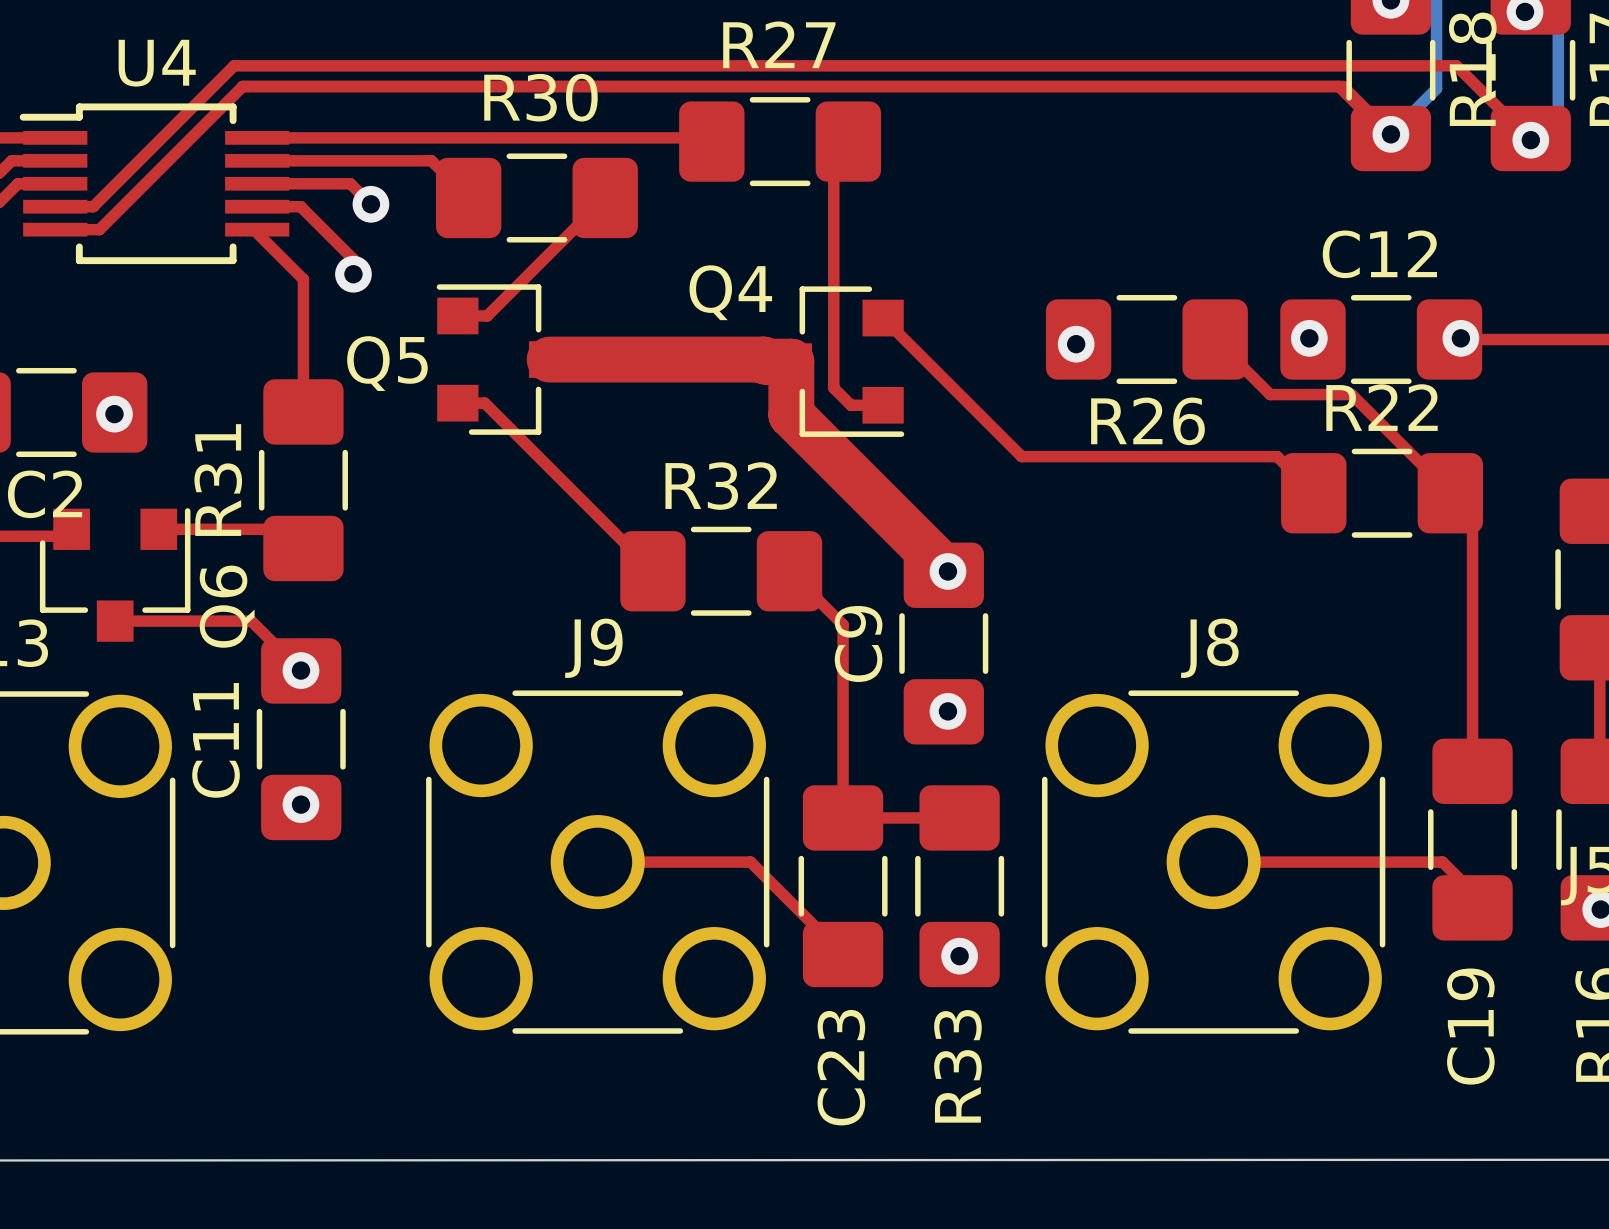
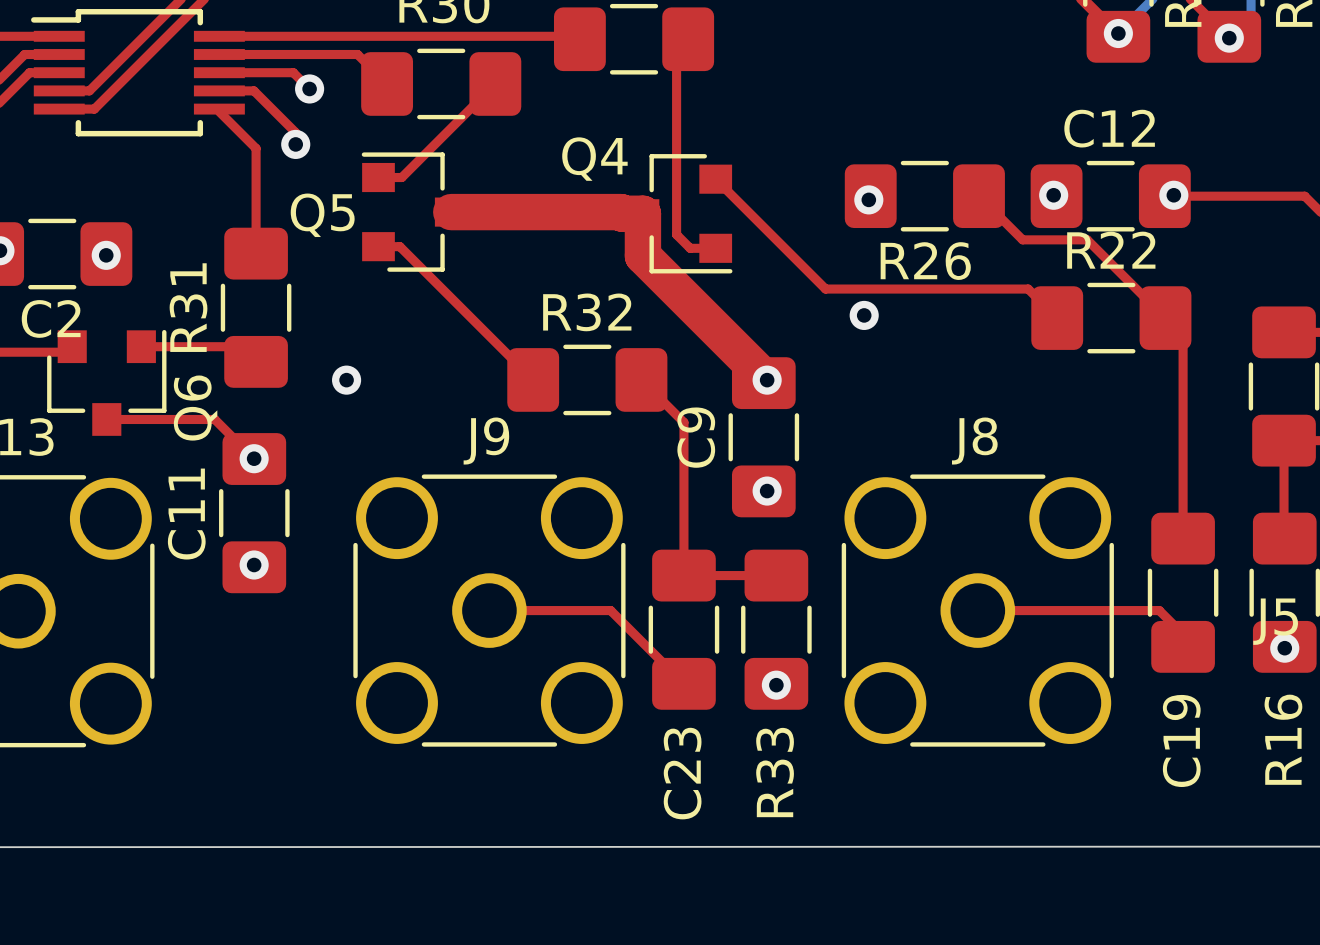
via: none -> (864, 315)
via: none -> (346, 380)

